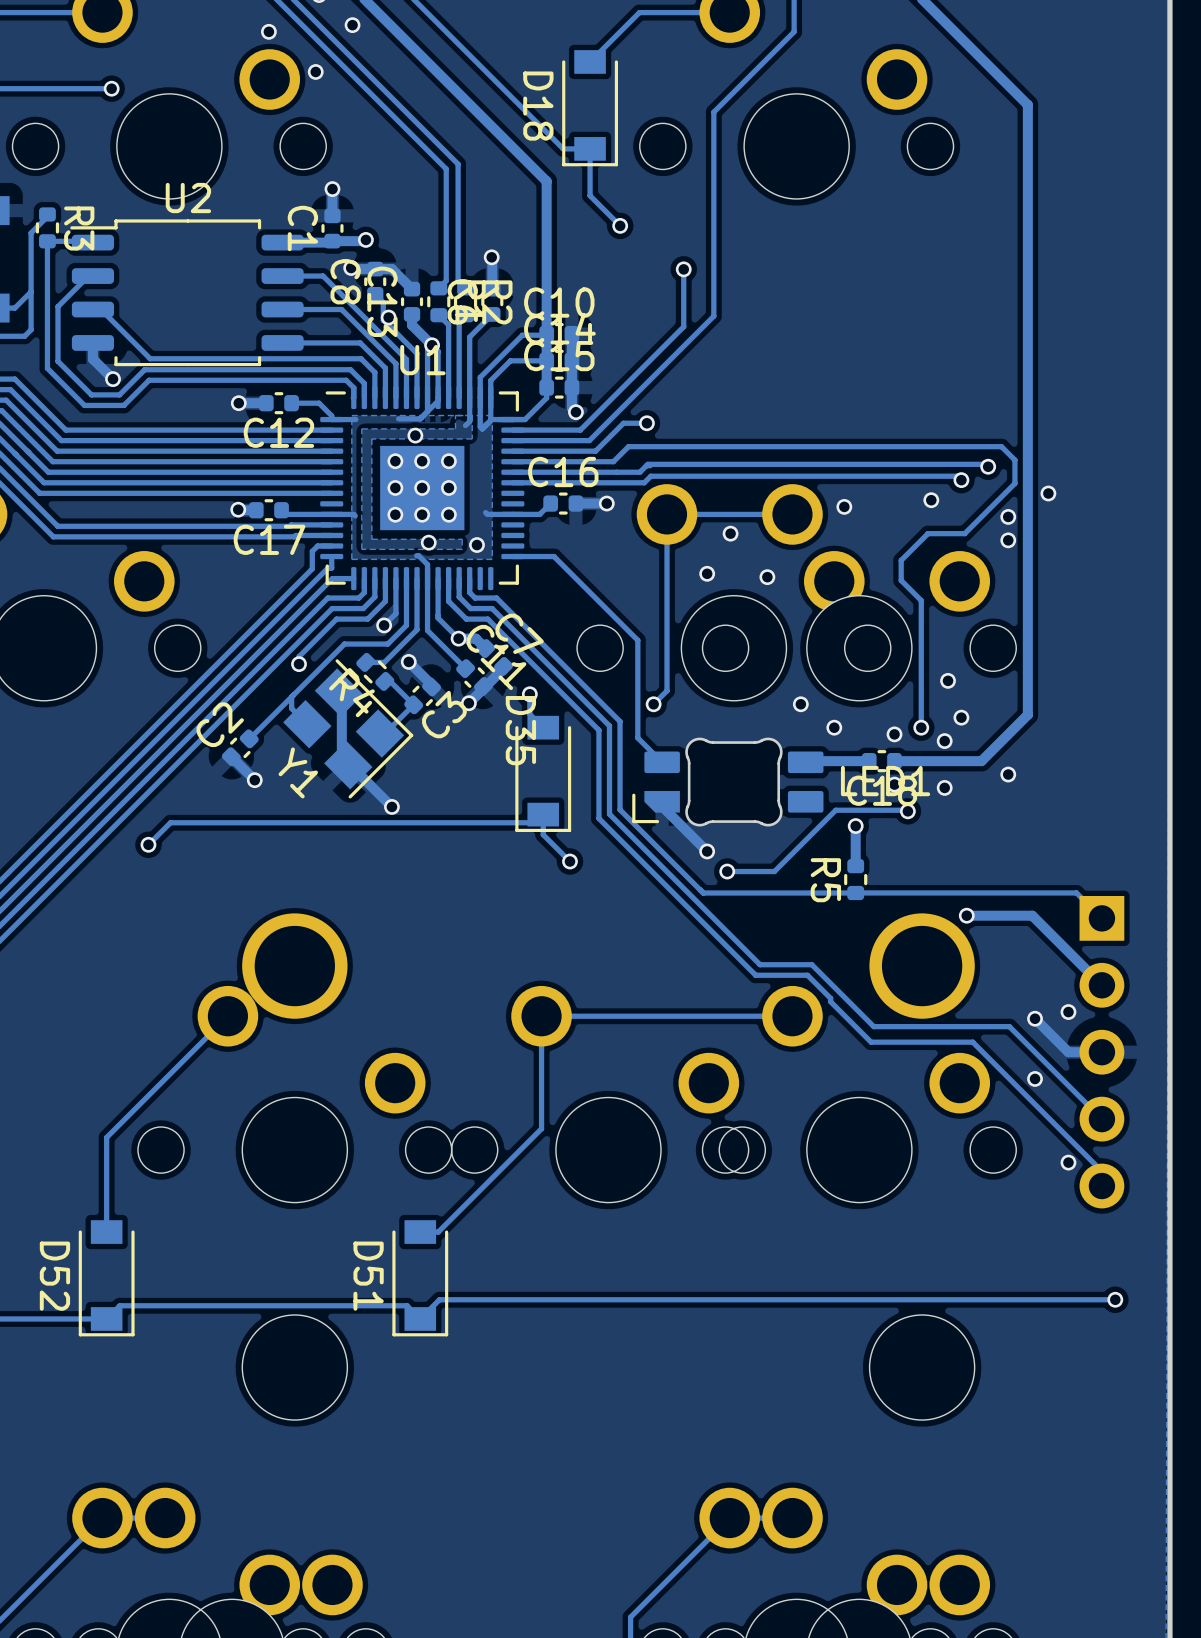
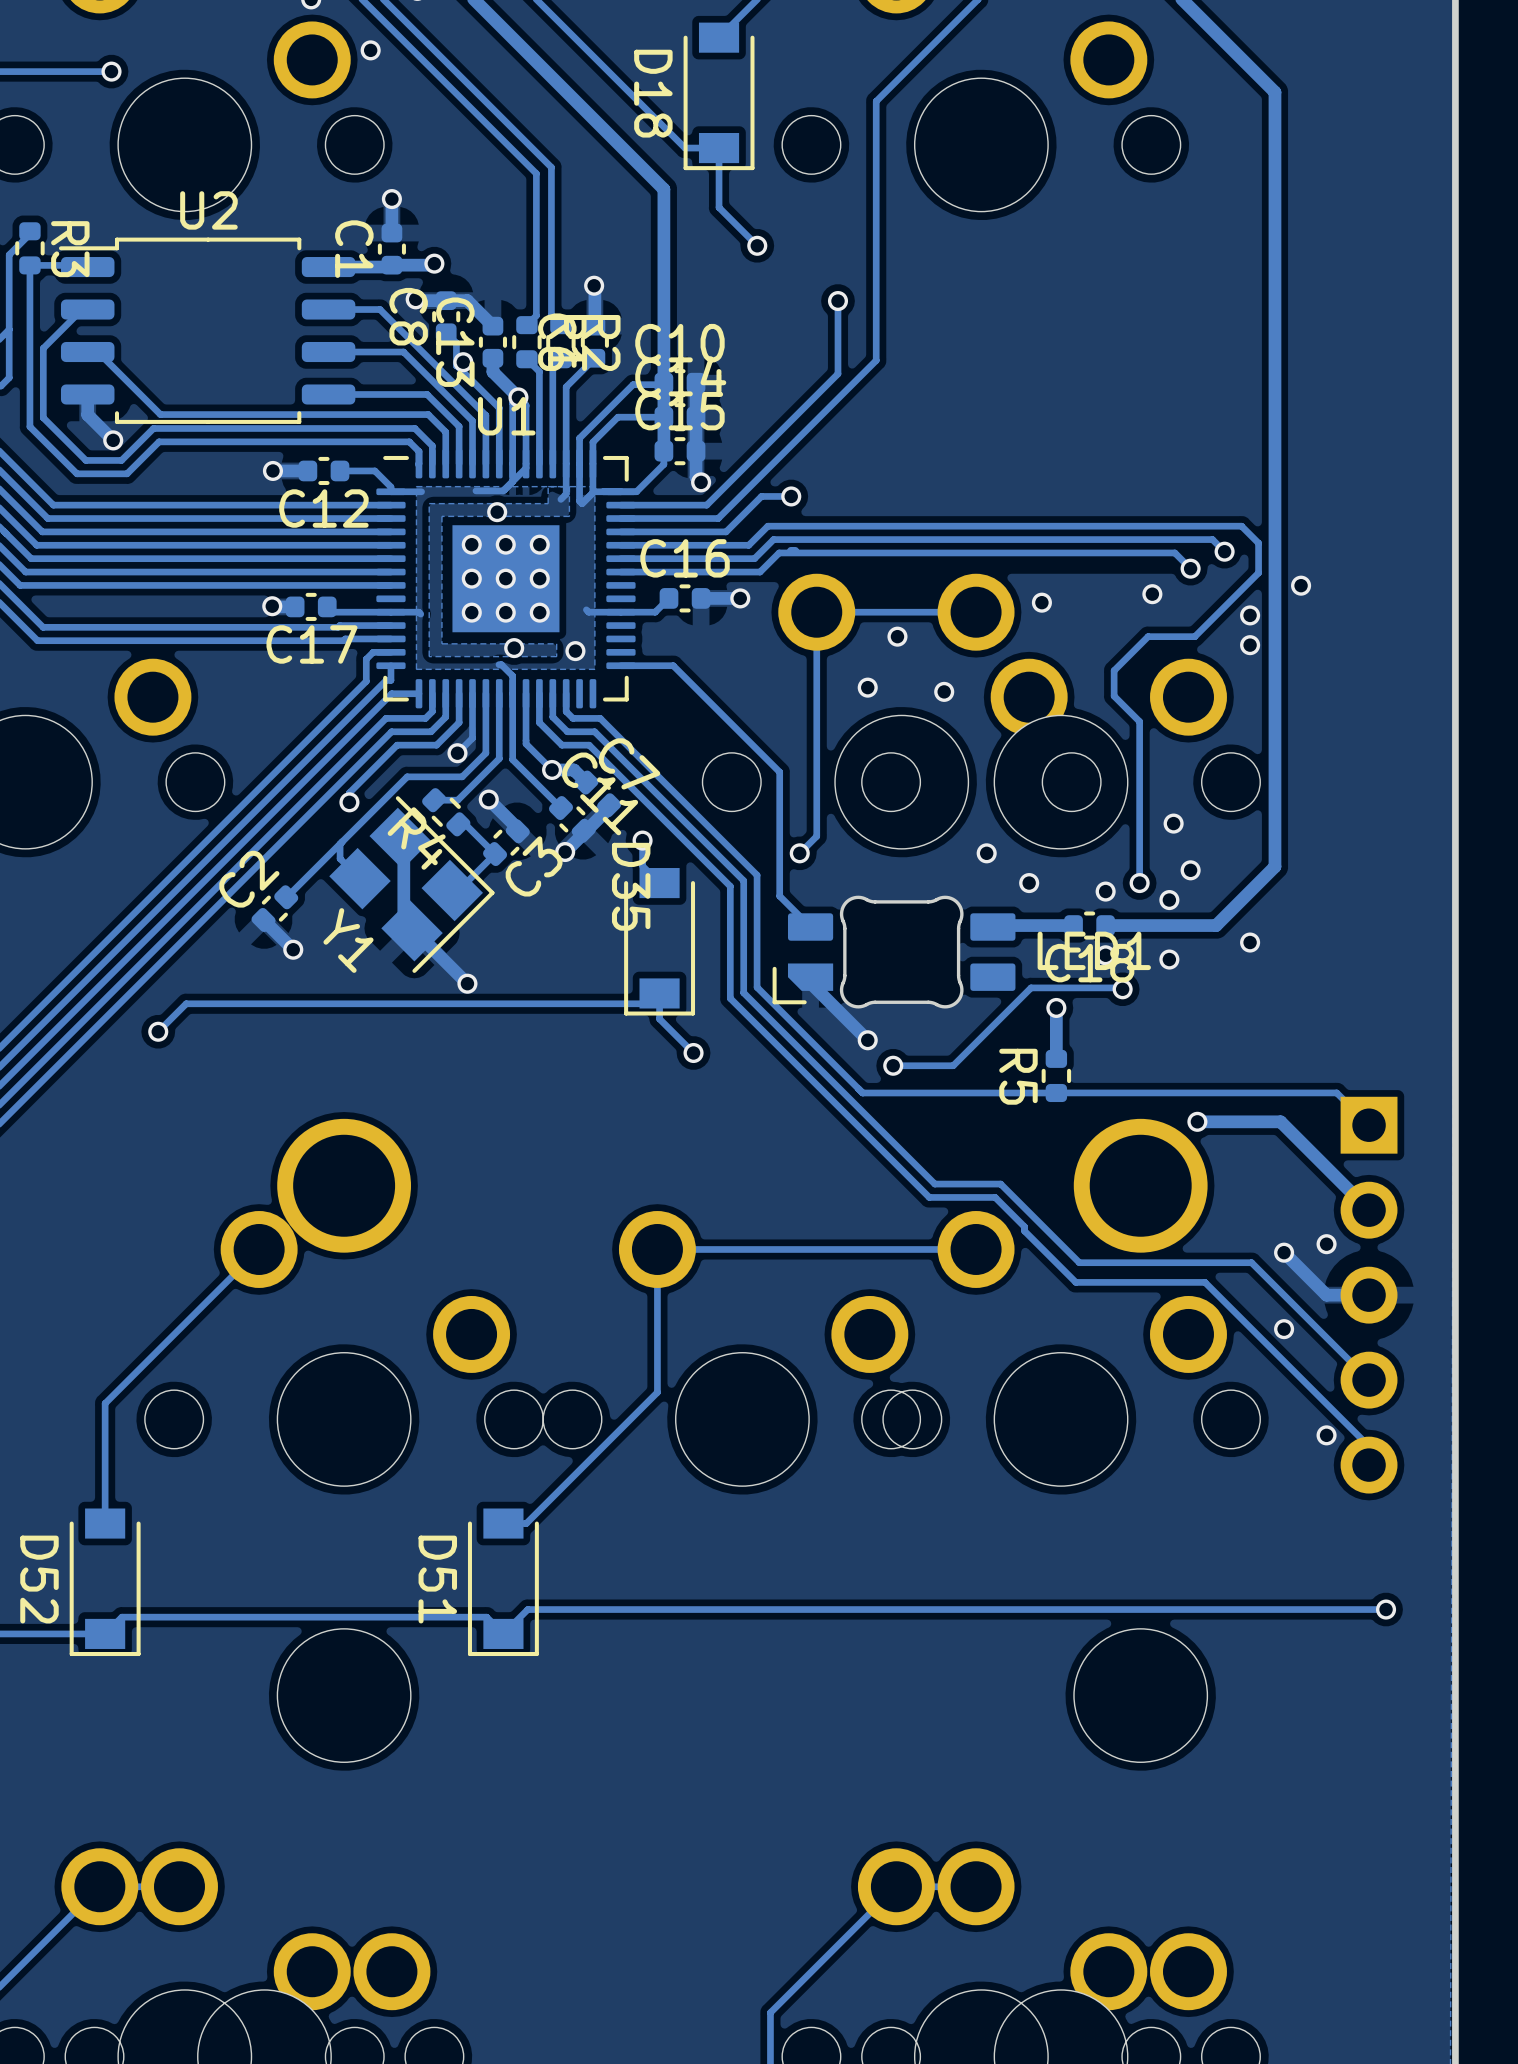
track: (985, 464) (647, 464) (639, 472) (618, 472) -> (1221, 548) (1212, 539) (773, 539) (754, 558)
track: (957, 476) (650, 476) (644, 482) (622, 482) -> (1185, 563) (1174, 552) (779, 552) (760, 572)

